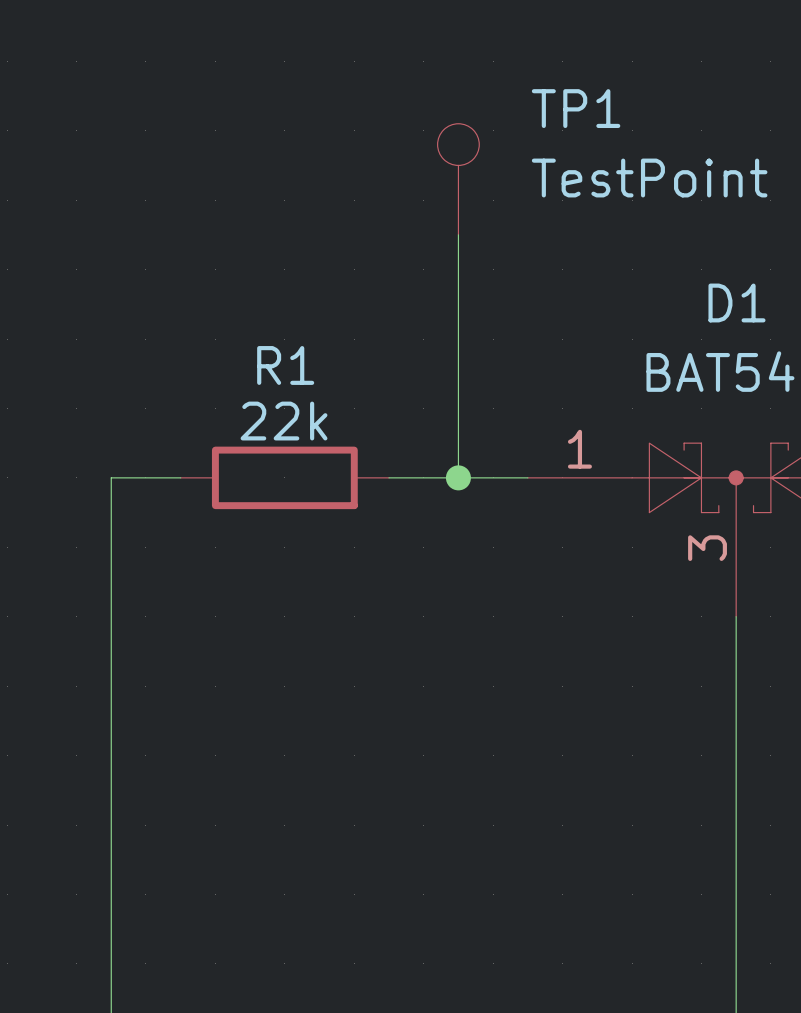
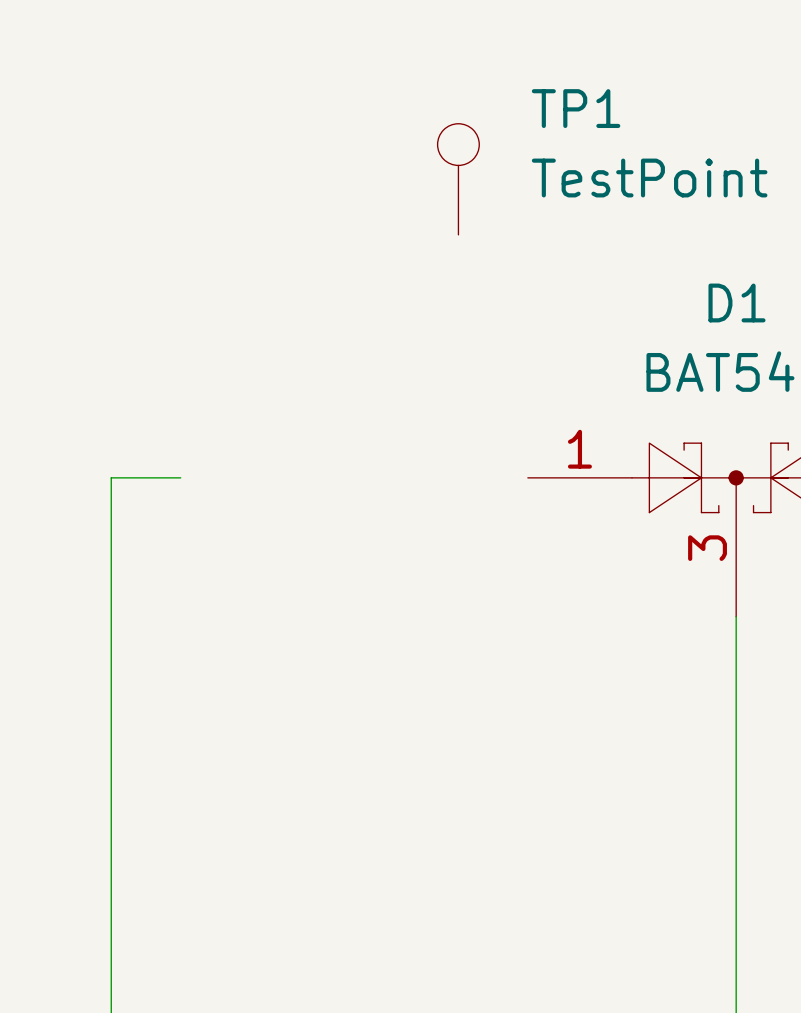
wire: (458, 234) (458, 477) -> none
R1: 22k (284, 477) -> none
wire: (389, 477) (527, 477) -> none
junction: (458, 477) -> none

